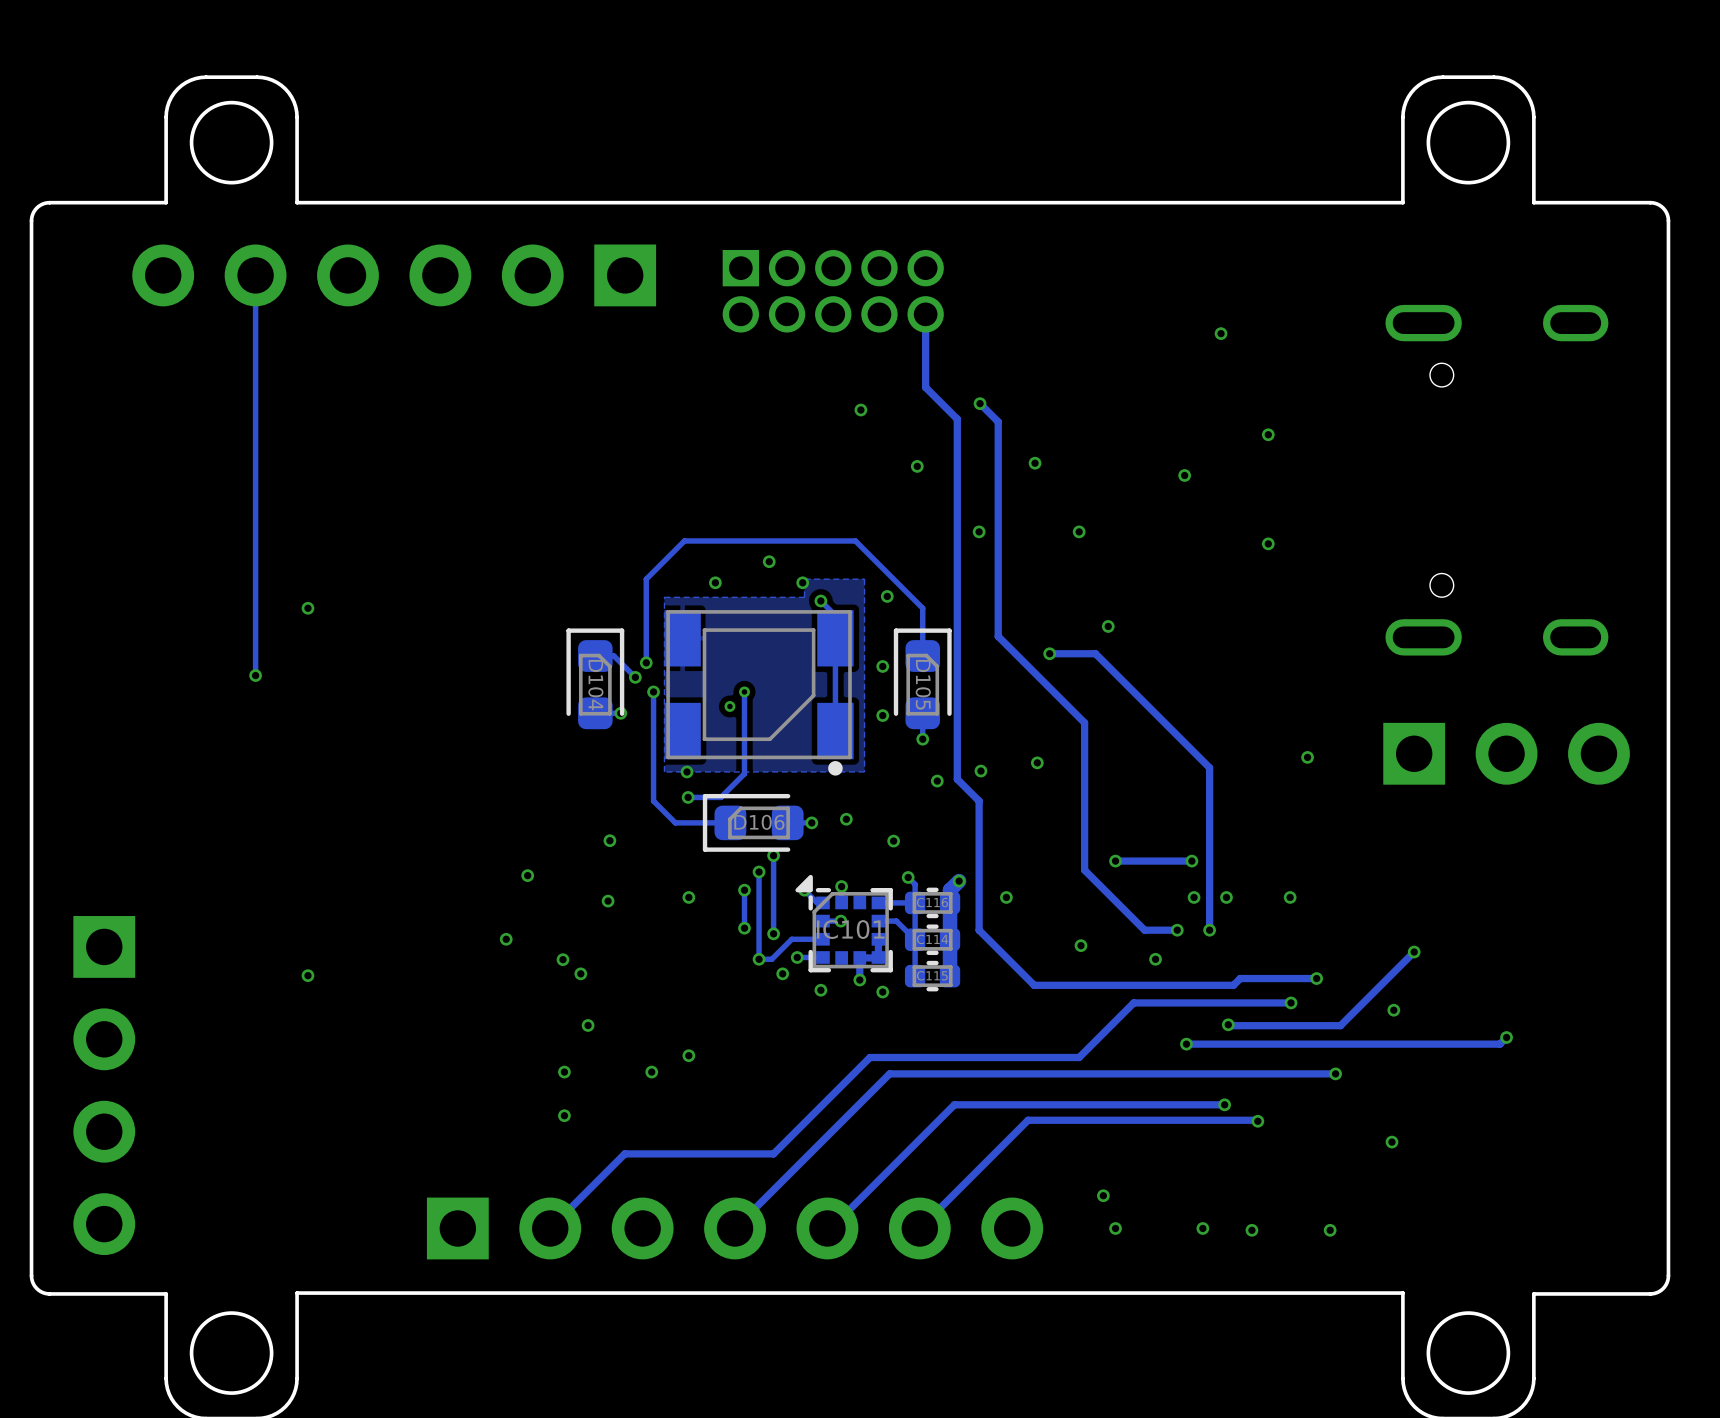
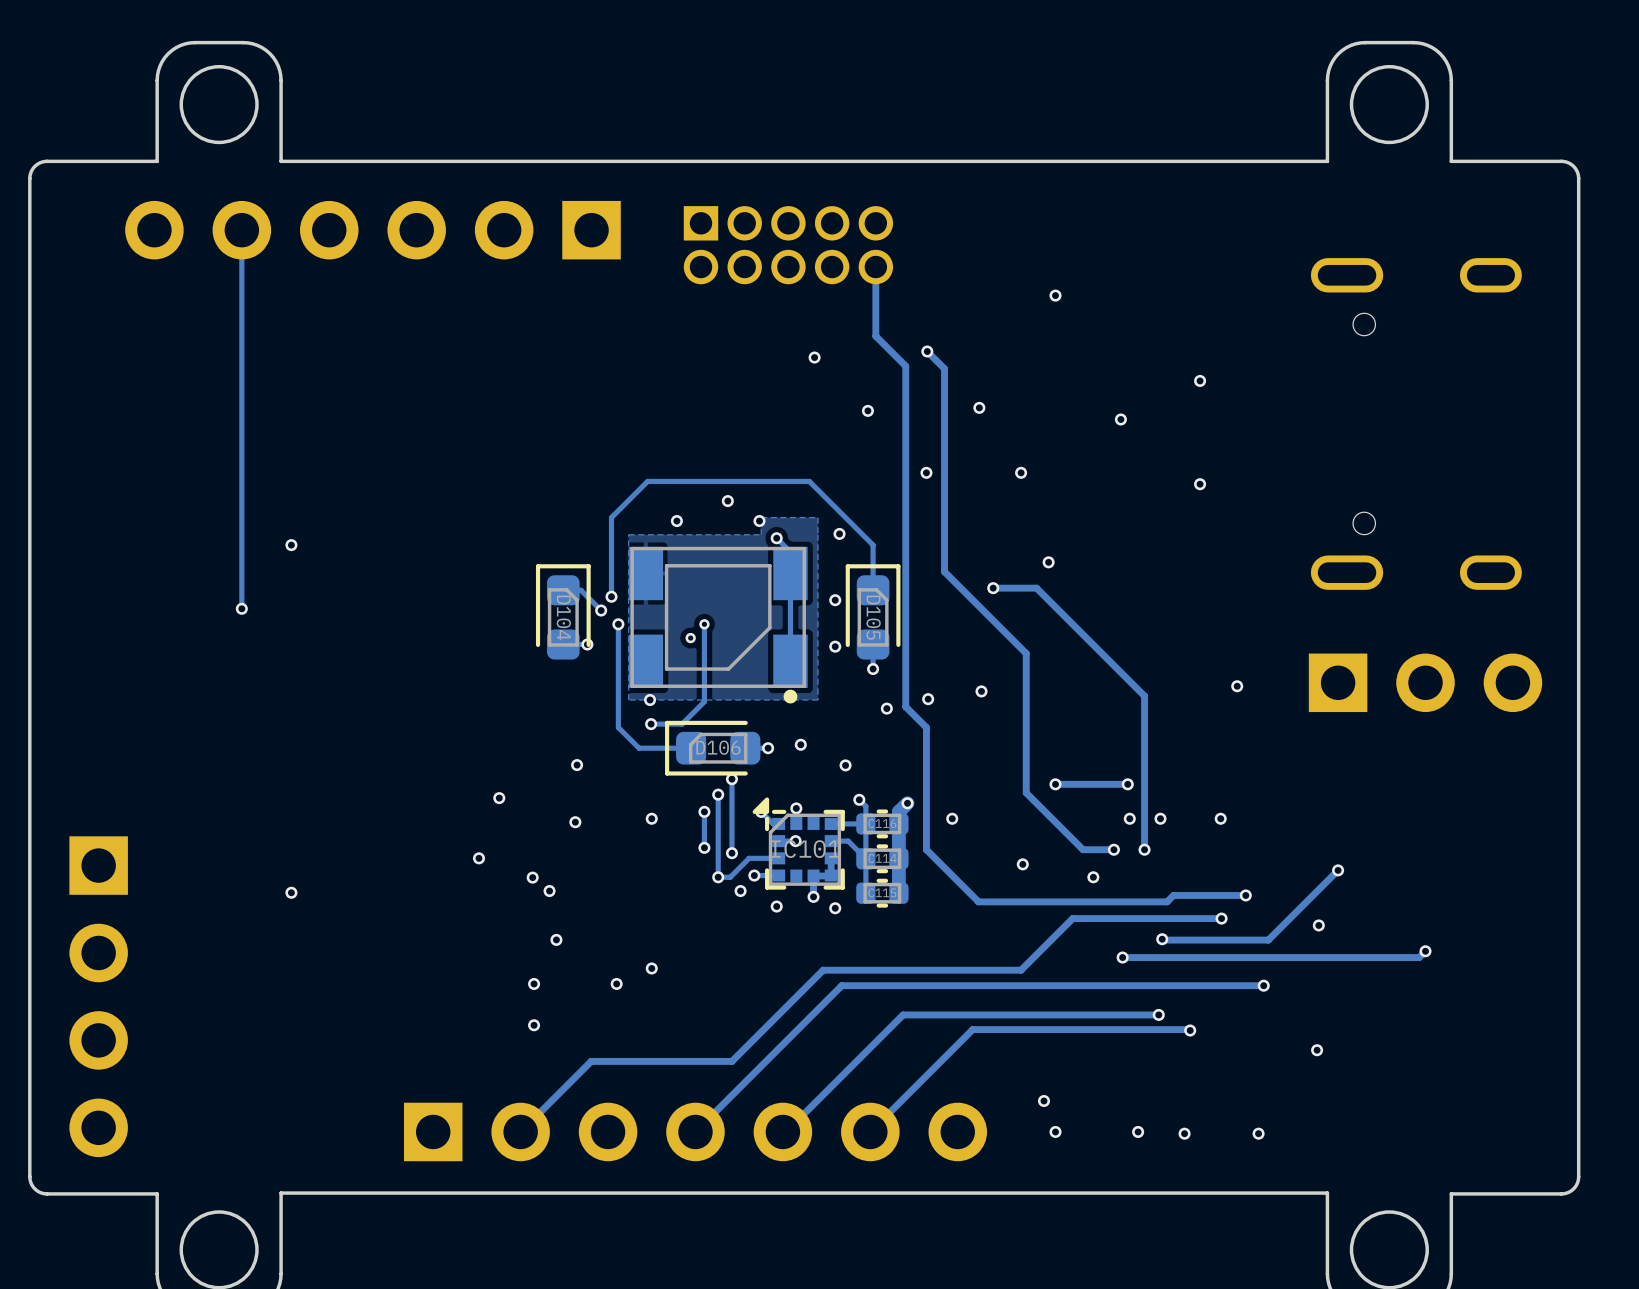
via position: (1221, 333) -> (1055, 295)

